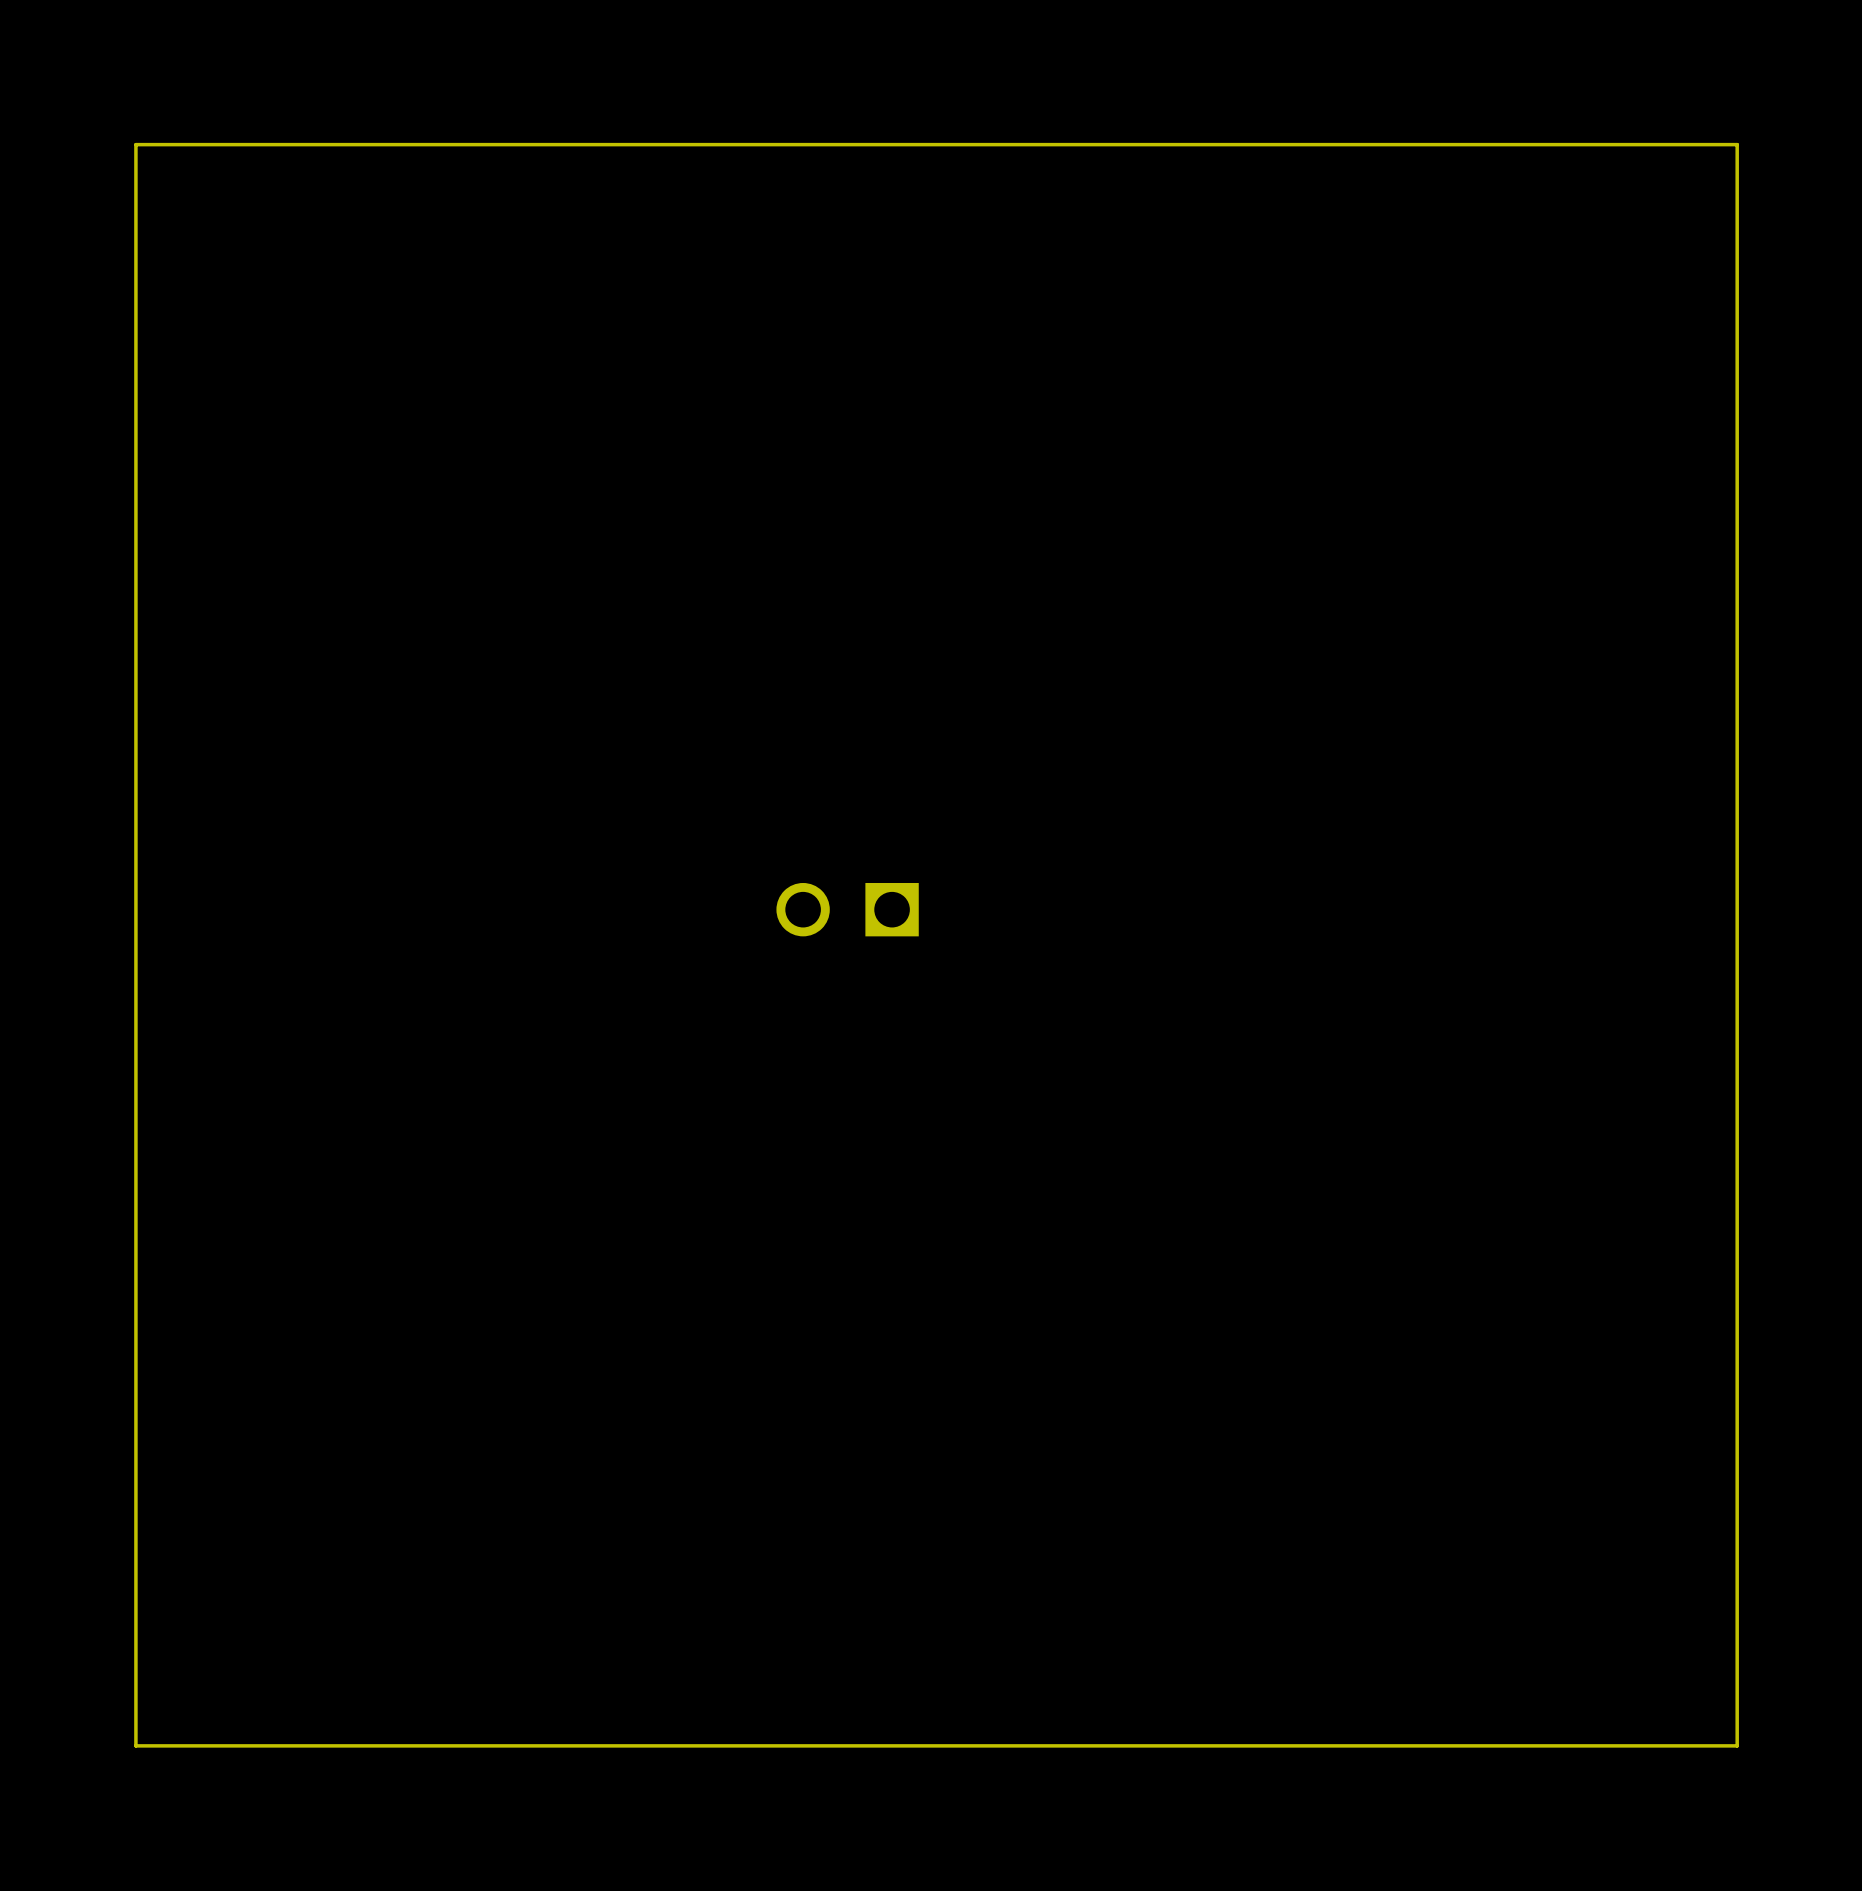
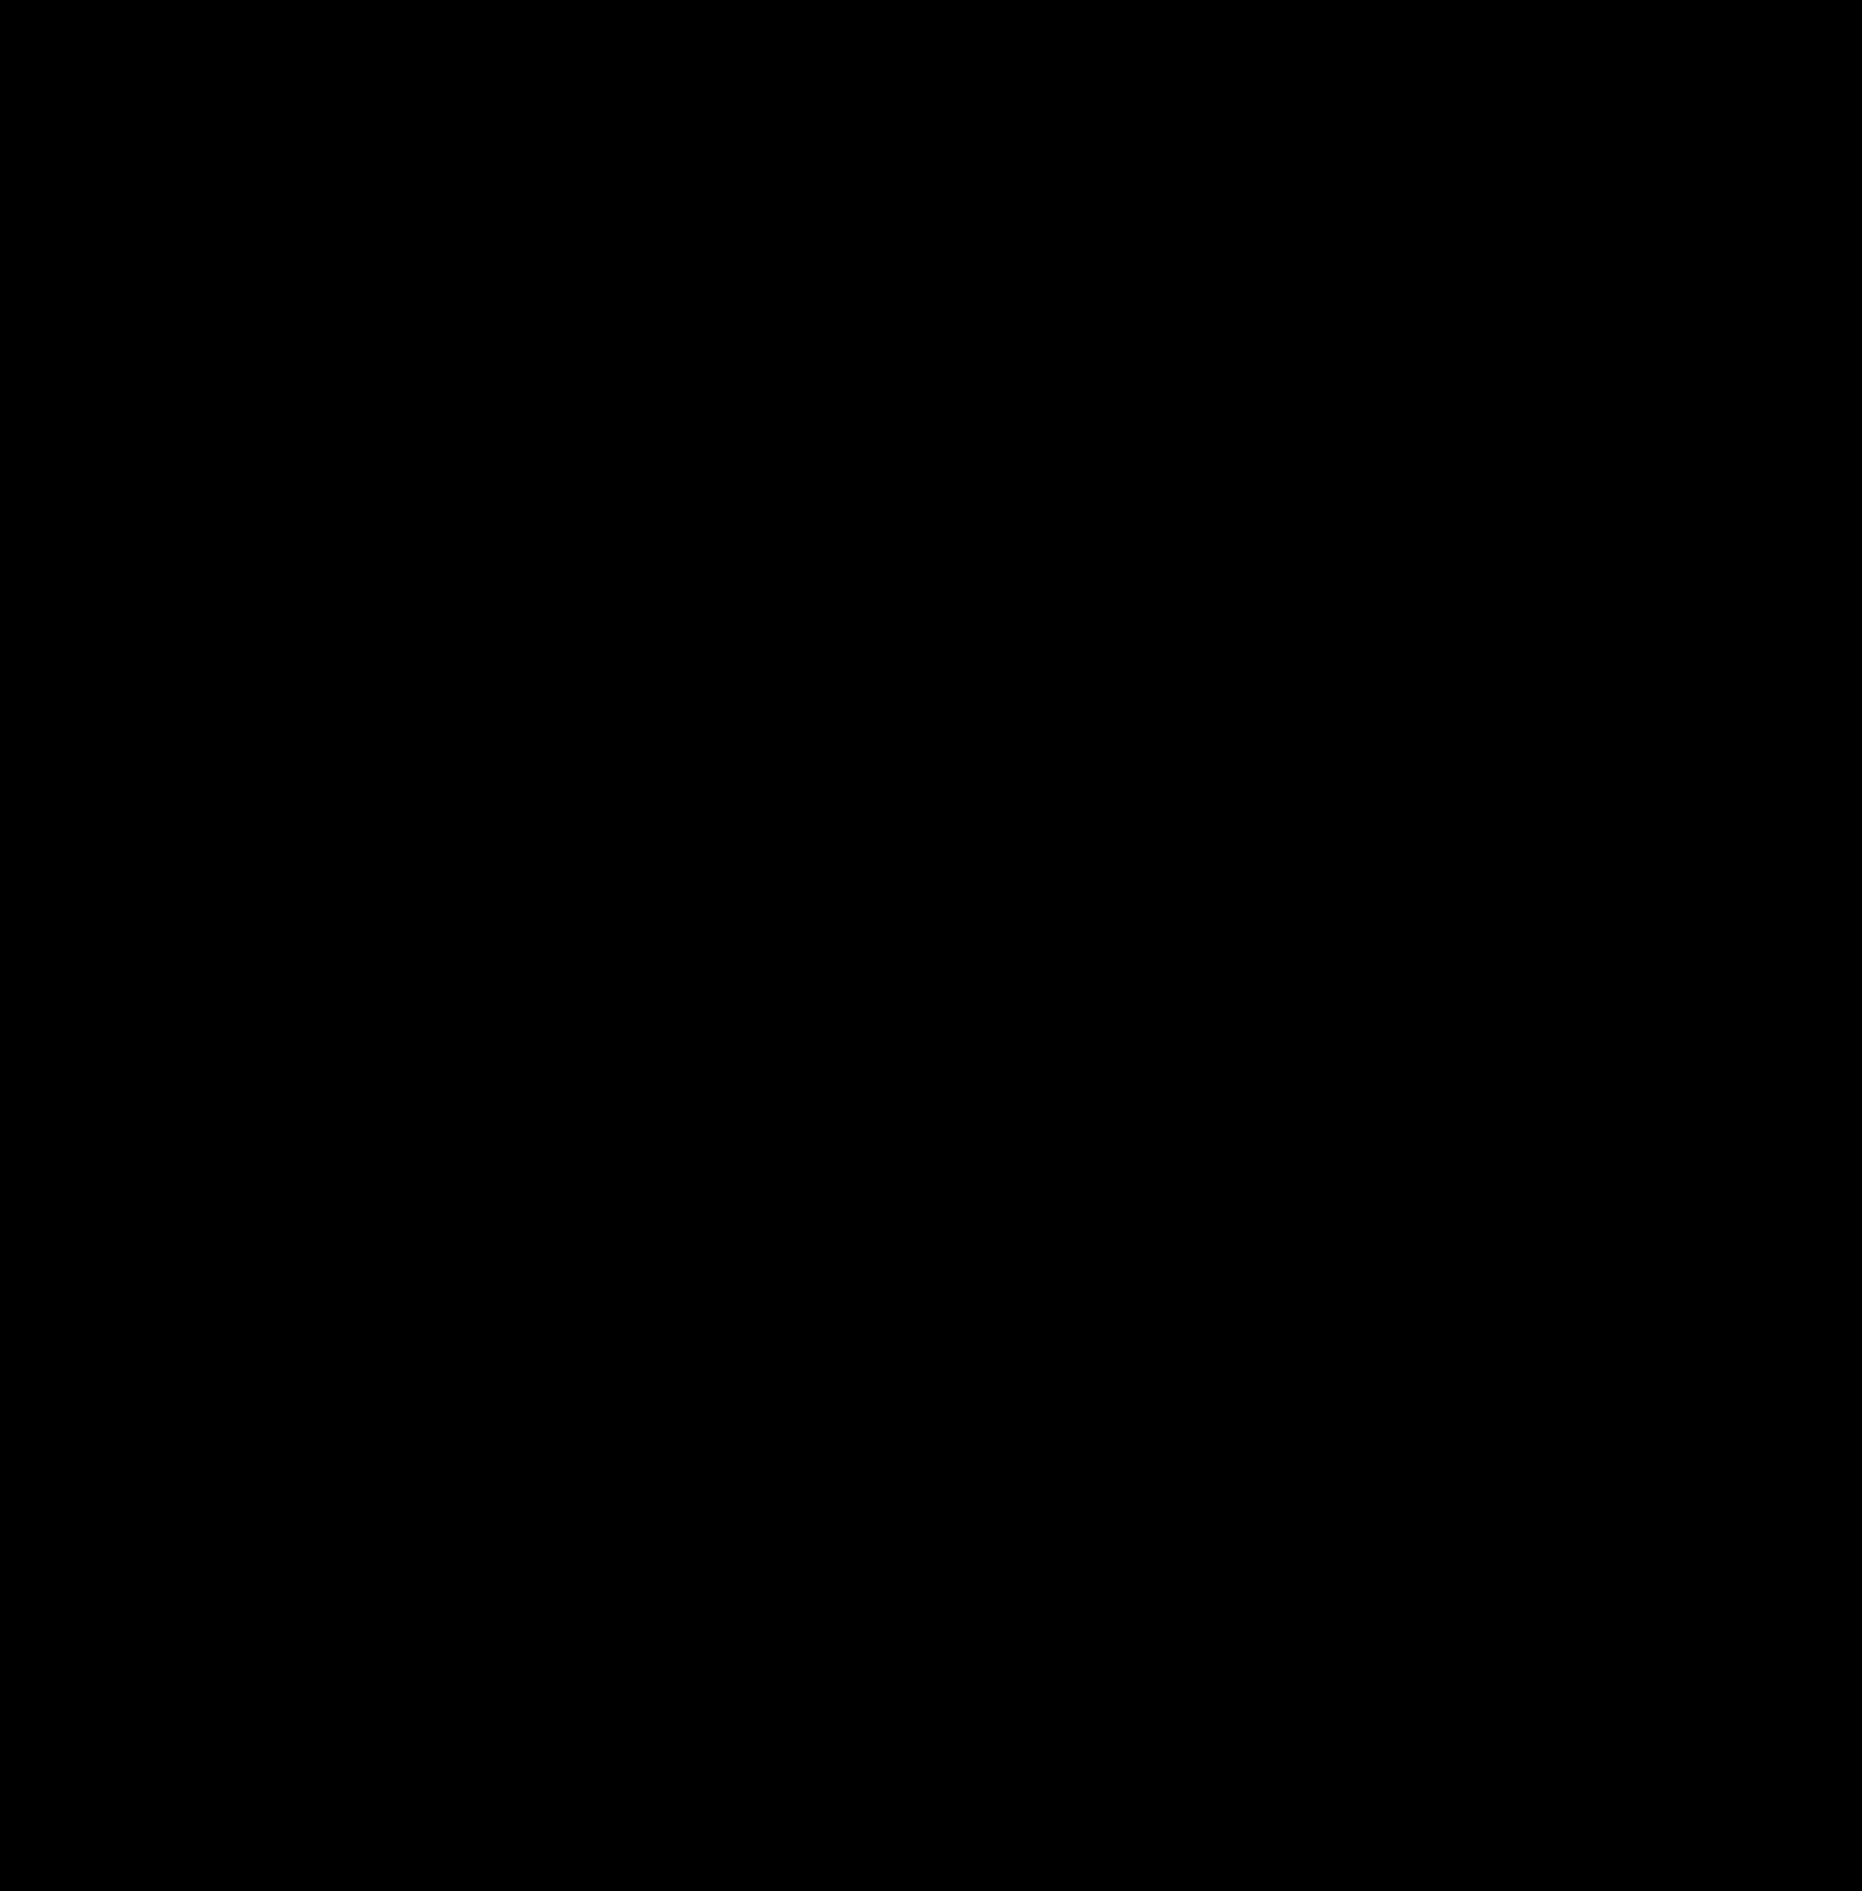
board edge: (1737, 144) (1737, 1745) (135, 1745) (135, 144) (1737, 144) -> none
part: (847, 909) -> none

